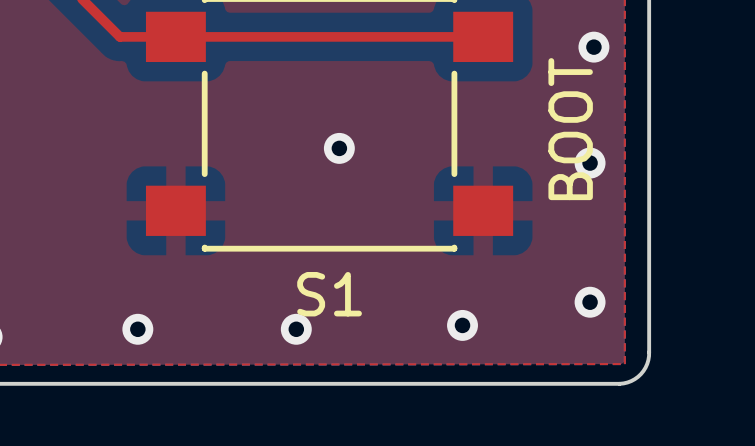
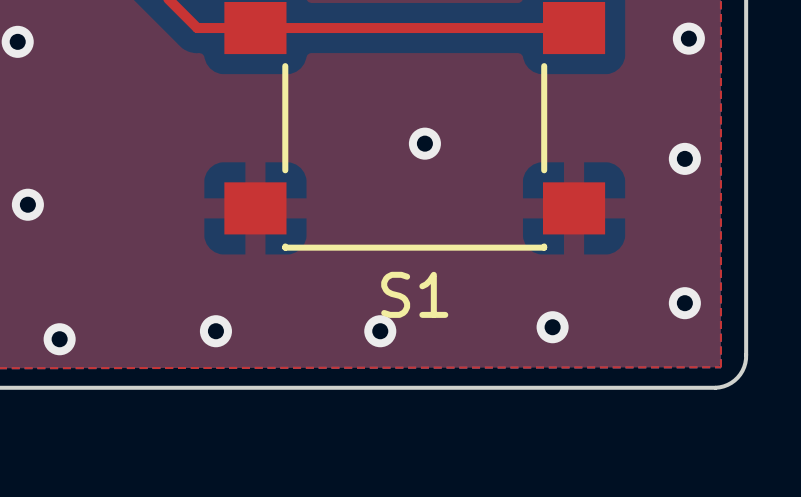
text: BOOT (570, 129) -> none

